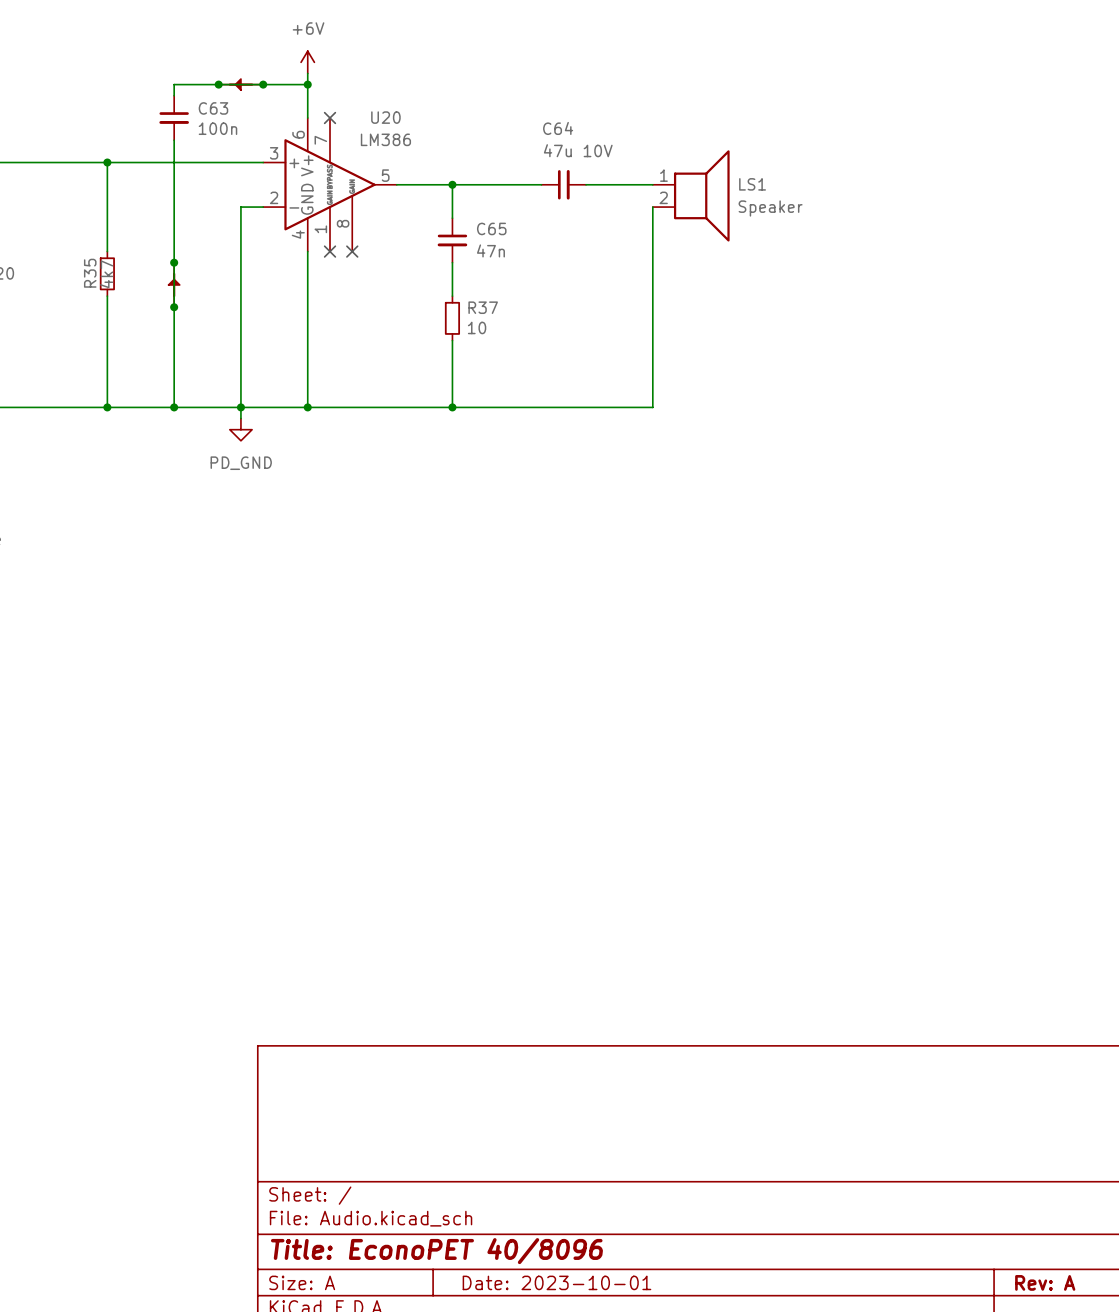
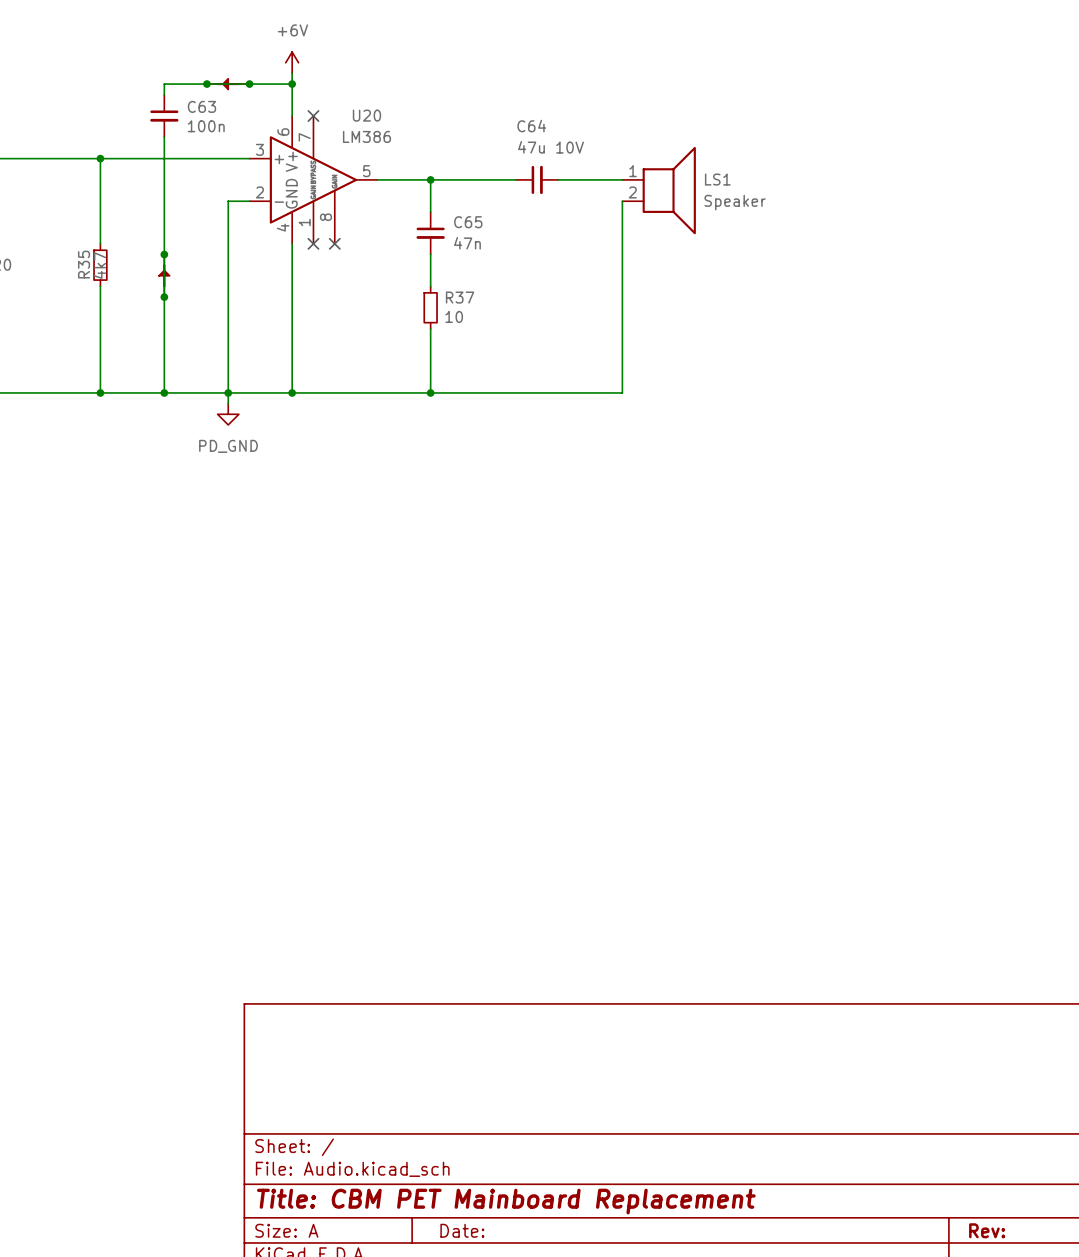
title block: Title: EconoPET 40/8096 (436, 1251) -> Title: CBM PET Mainboard Replacement (506, 1201)
title block: Date: 2023-10-01 (556, 1282) -> Date: (462, 1230)
title block: Rev: A (1045, 1282) -> Rev: (987, 1230)

